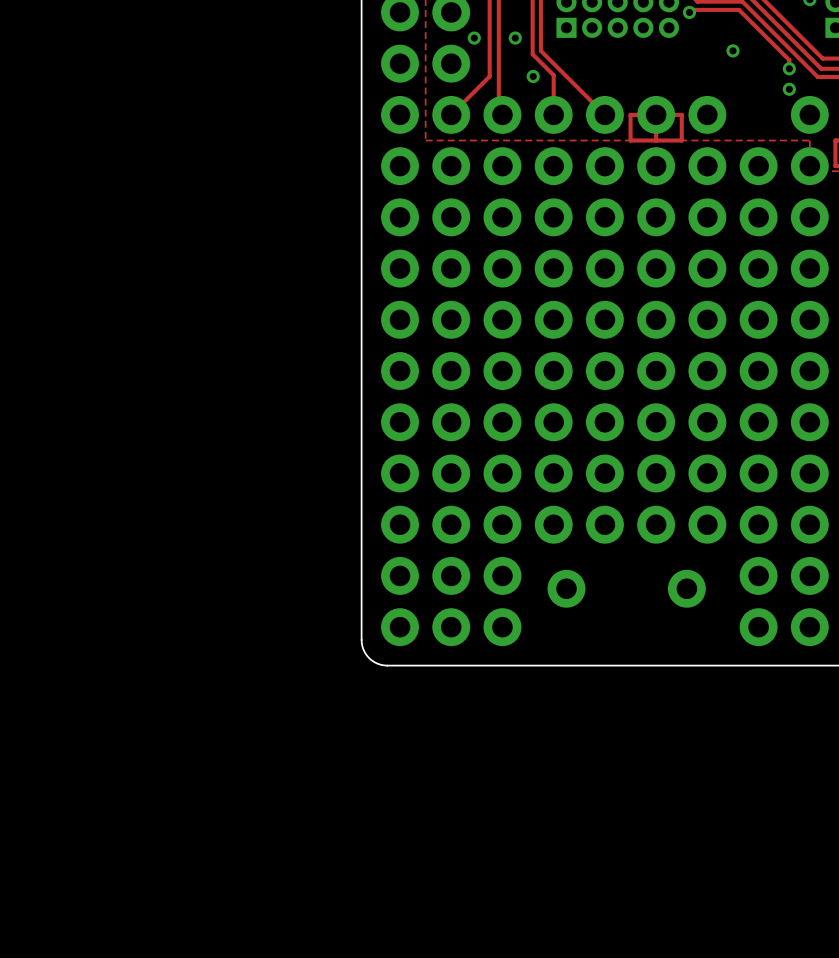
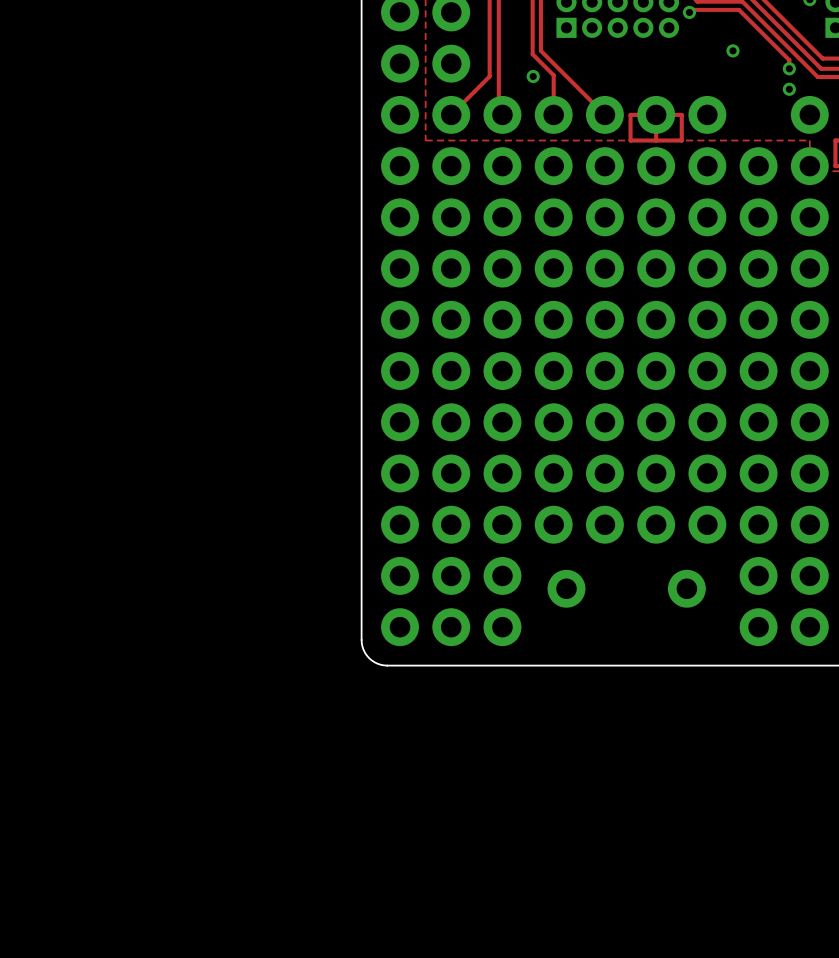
via: (474, 38) -> none
via: (515, 38) -> none

